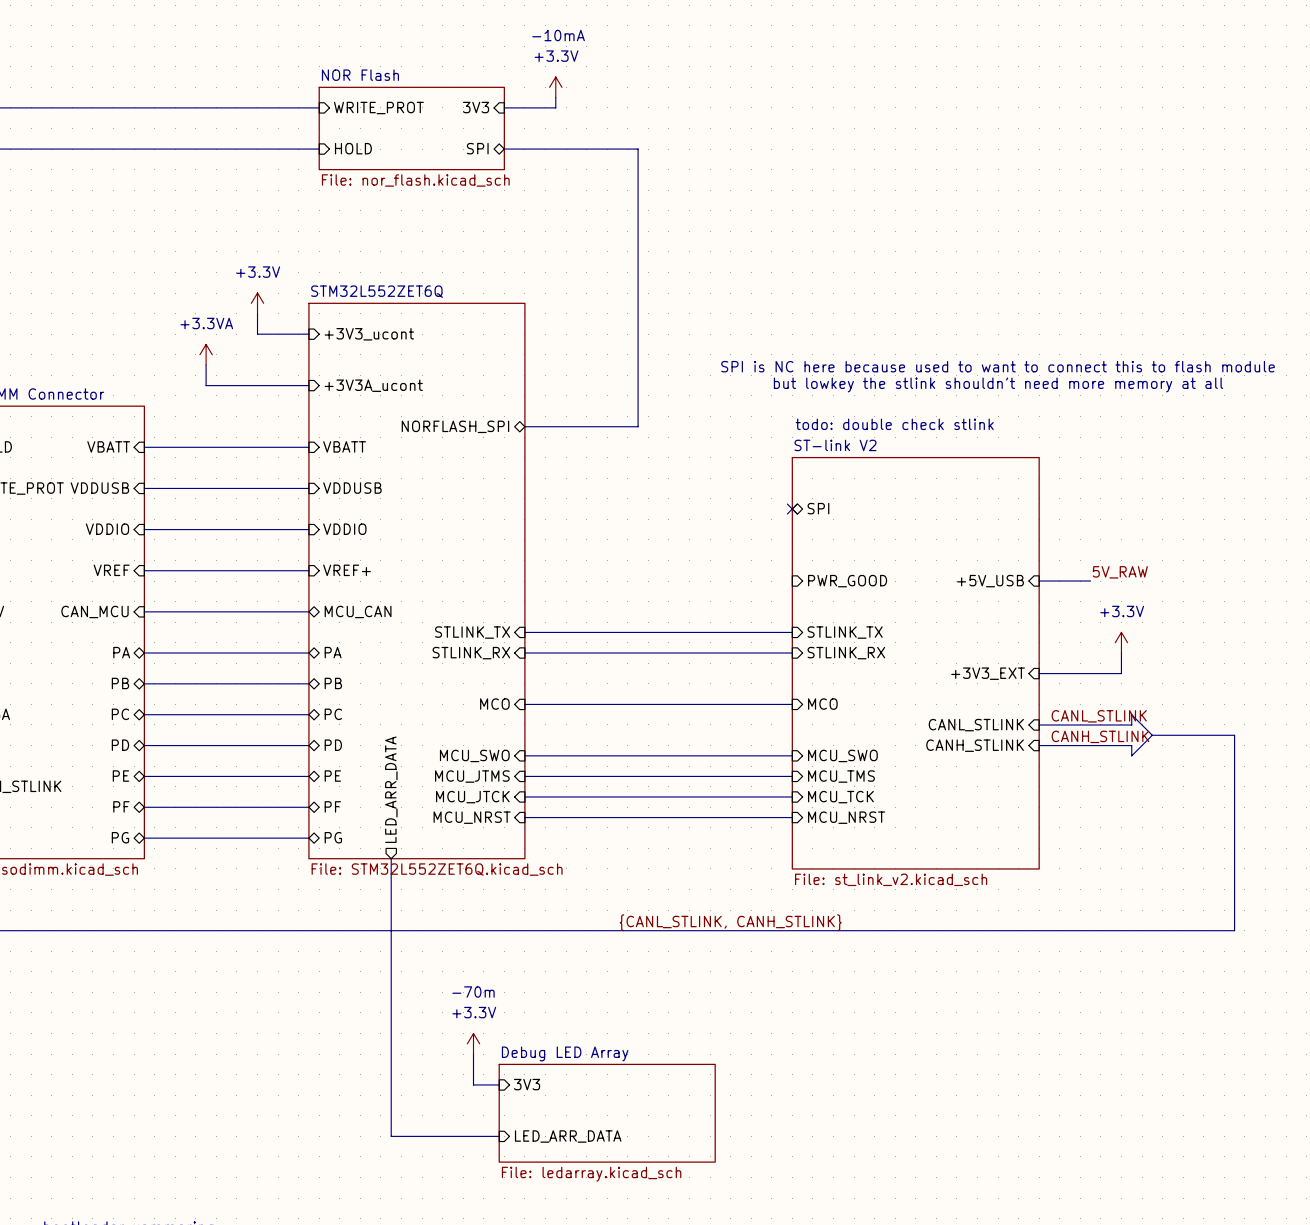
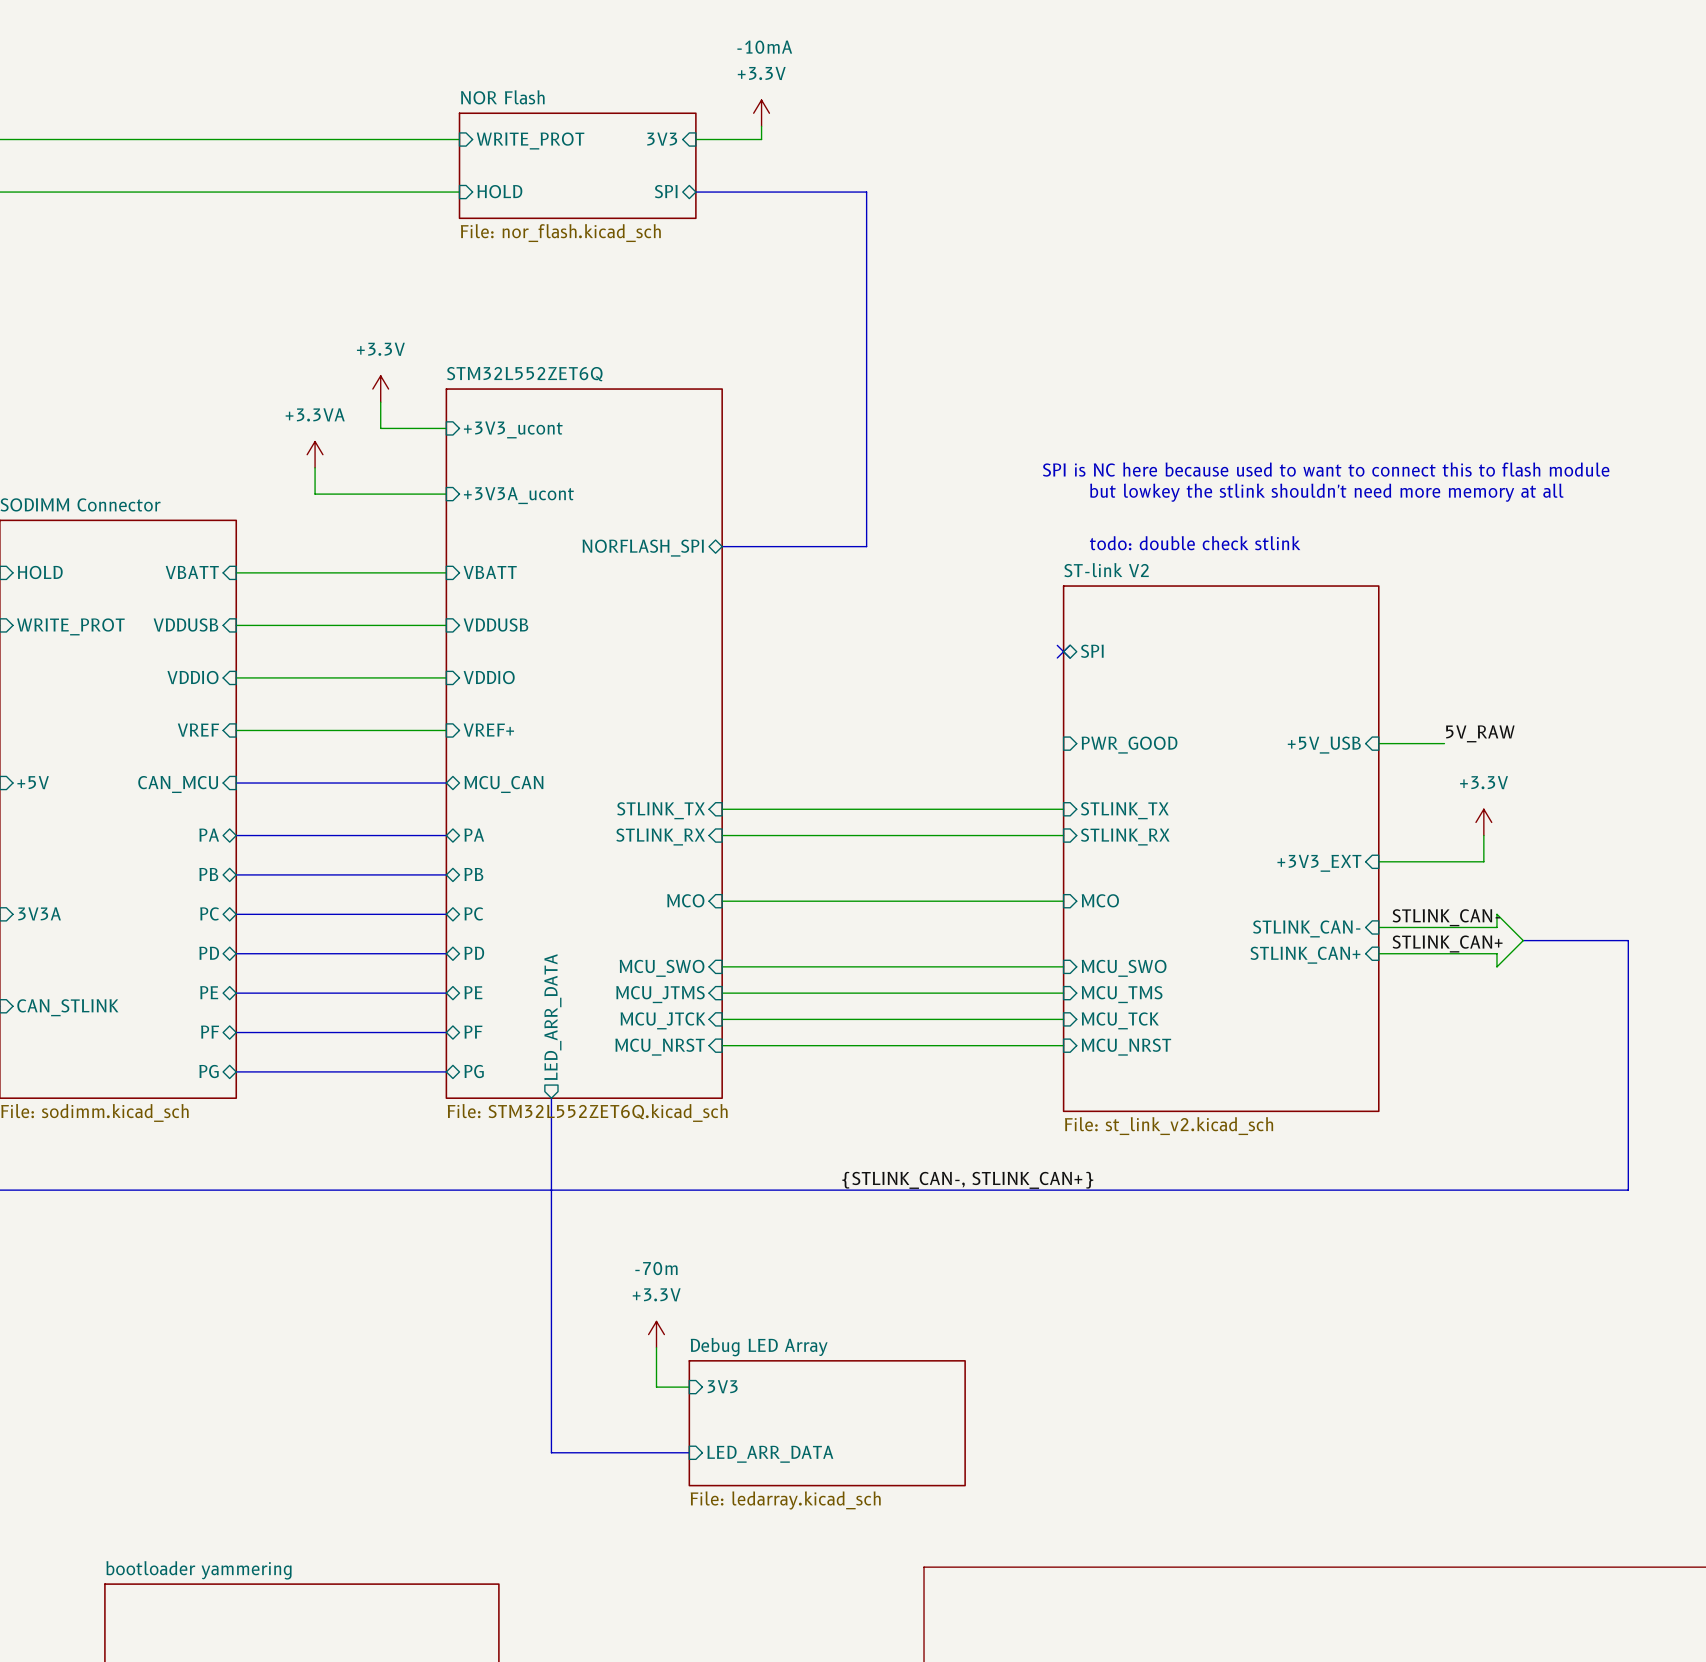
label: CANL_STLINK (1099, 716) -> STLINK_CAN- (1446, 917)
sheet pin: CANL_STLINK (976, 725) -> STLINK_CAN- (1306, 928)
label: CANH_STLINK (1100, 736) -> STLINK_CAN+ (1447, 943)
sheet pin: CANH_STLINK (975, 745) -> STLINK_CAN+ (1305, 955)
label: {CANL_STLINK, CANH_STLINK} (730, 922) -> {STLINK_CAN-, STLINK_CAN+} (967, 1180)

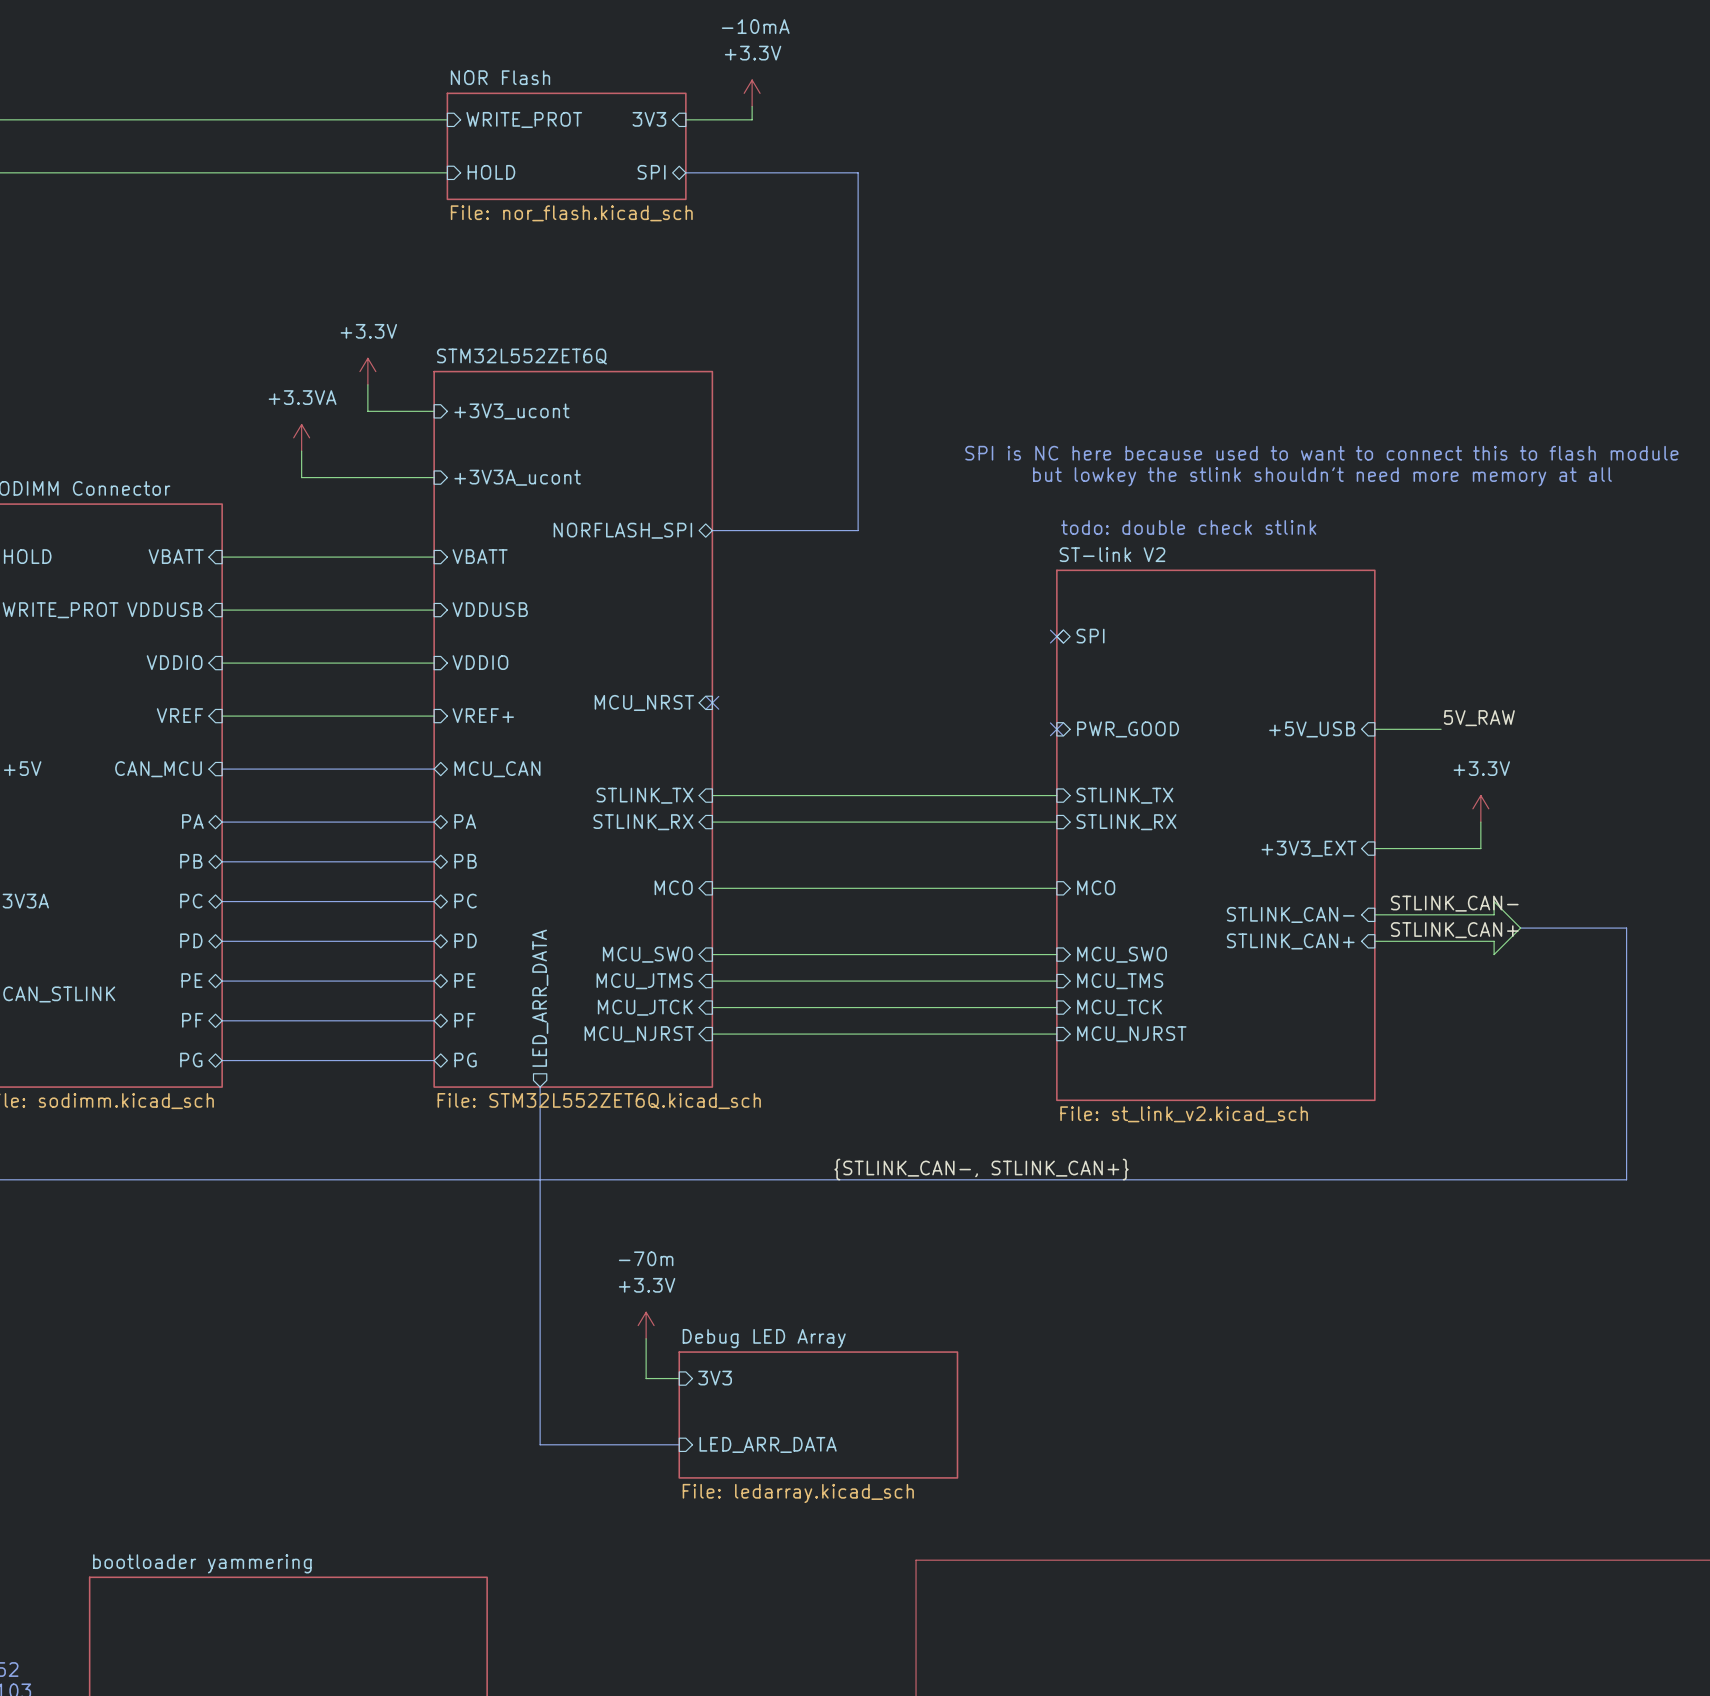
no-connect mark: none -> (712, 702)
sheet pin: none -> MCU_NRST (644, 702)
no-connect mark: none -> (1056, 729)
sheet pin: MCU_NRST (660, 1047) -> MCU_NJRST (639, 1034)
sheet pin: MCU_NRST (1126, 1047) -> MCU_NJRST (1131, 1034)

